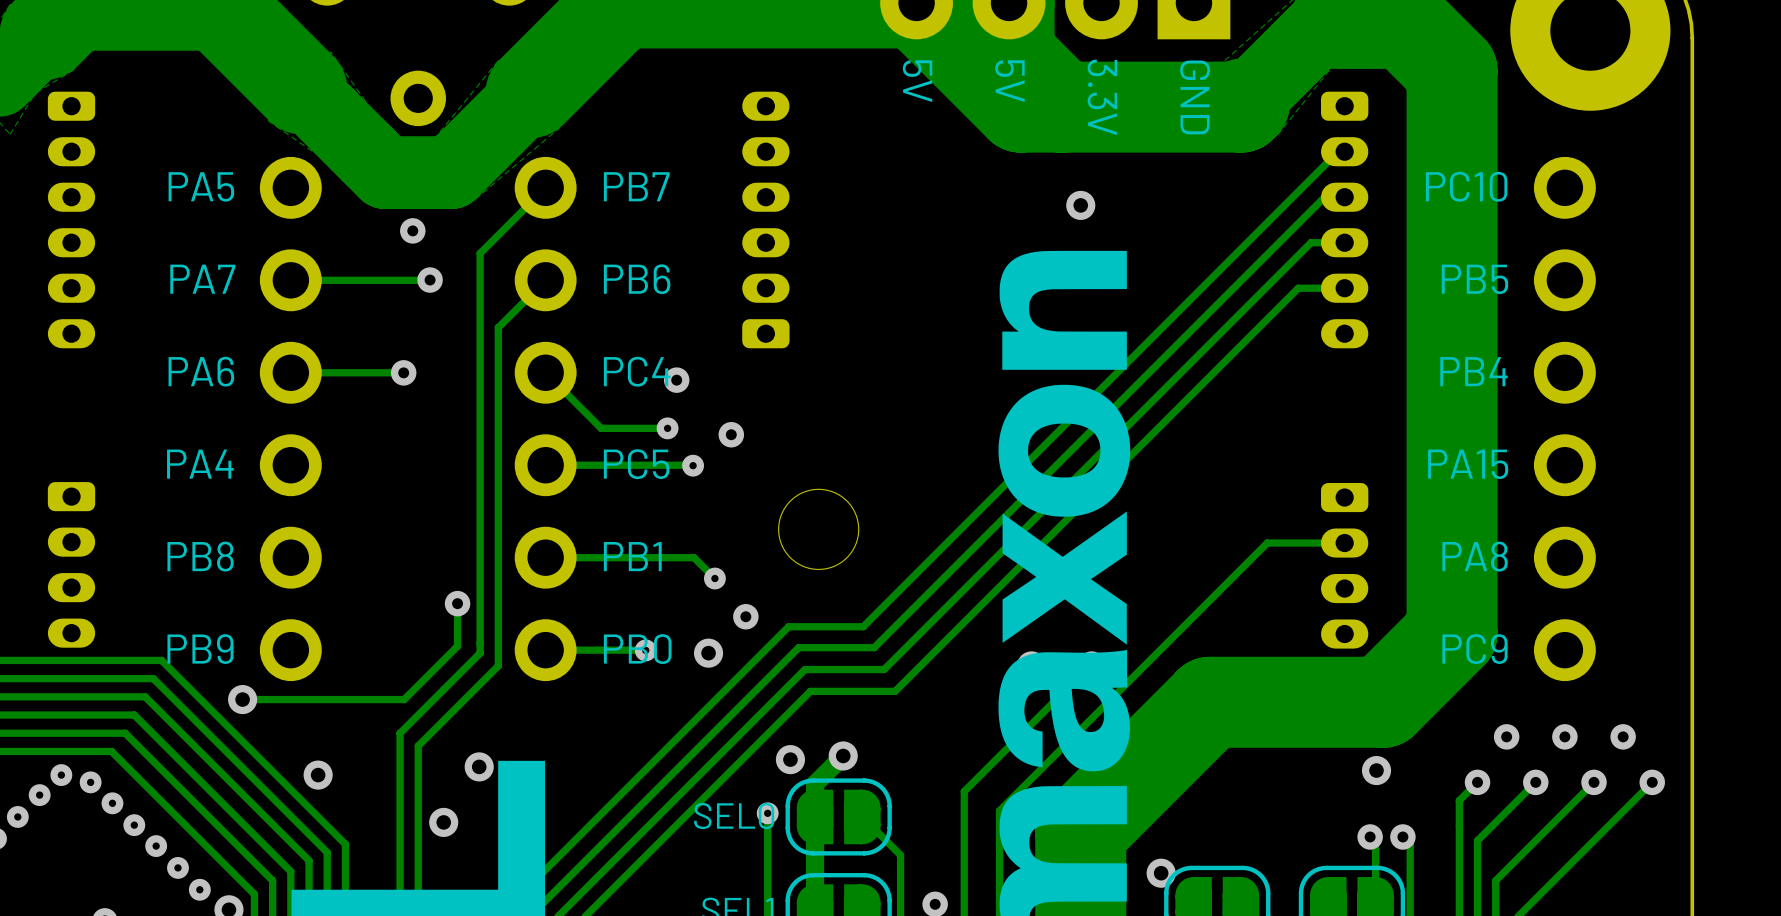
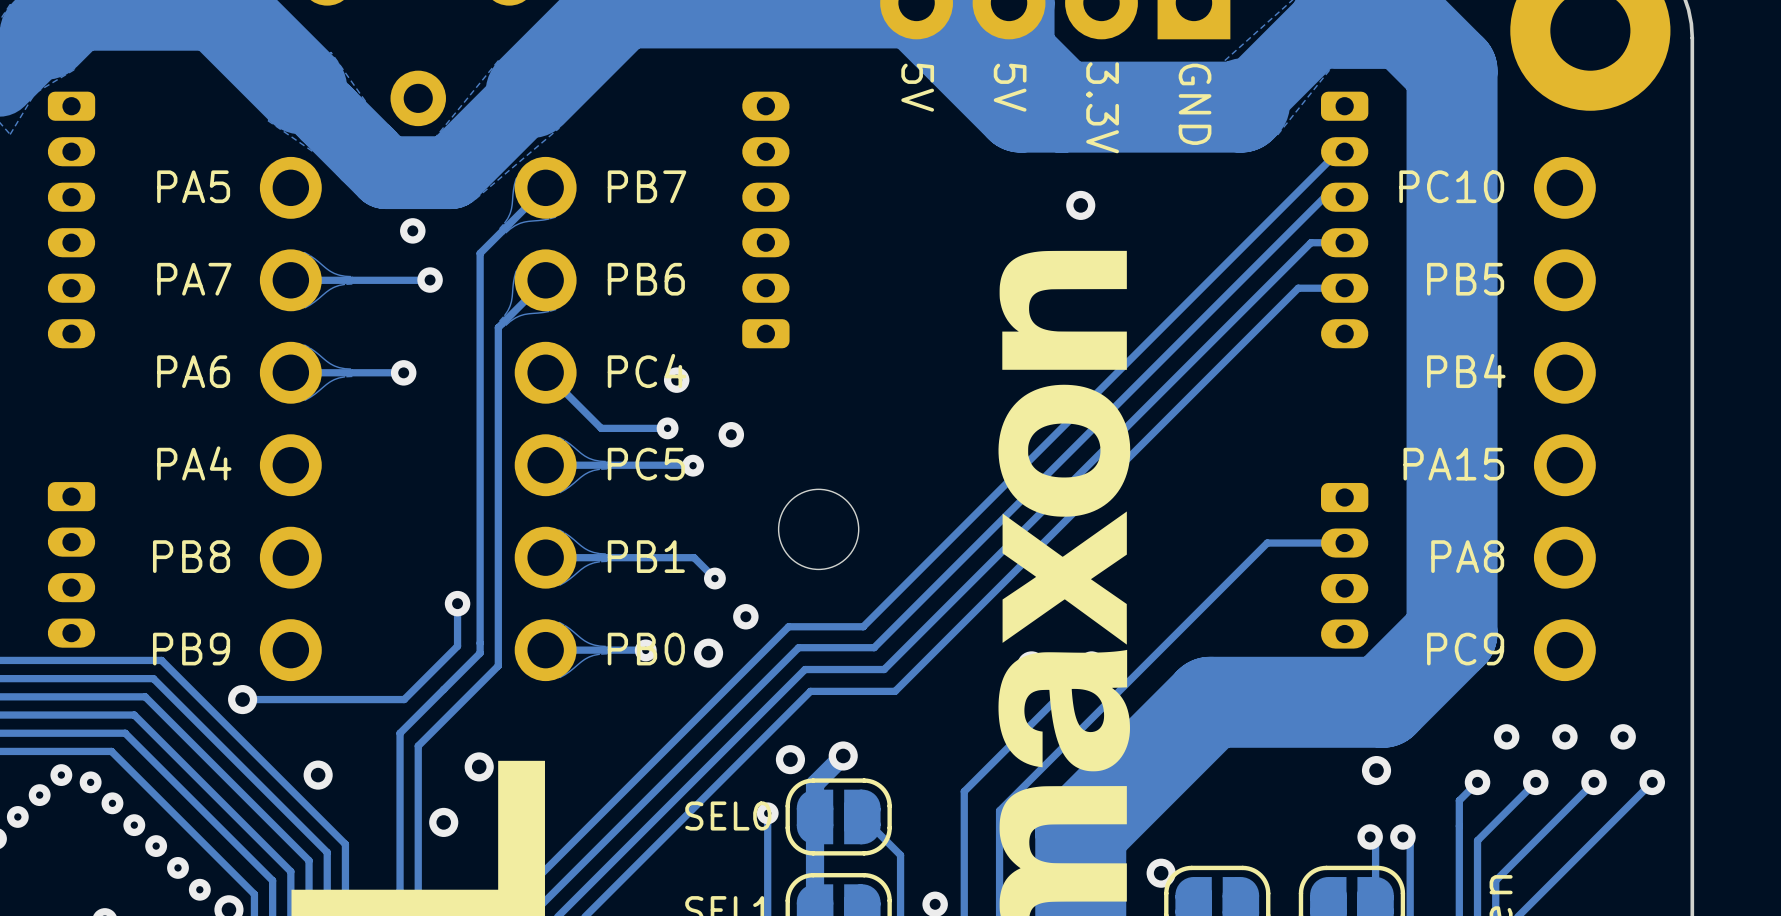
zone outline: none -> (556, 176) (516, 177) (510, 213) (499, 228) (504, 233) (519, 223) (555, 217) (556, 176)
zone outline: none -> (304, 252) (275, 280) (304, 308) (334, 287) (352, 283) (352, 276) (334, 273) (304, 252)
zone outline: none -> (556, 269) (516, 270) (510, 306) (499, 321) (504, 326) (519, 315) (555, 309) (556, 269)
zone outline: none -> (304, 344) (275, 372) (304, 400) (334, 379) (352, 376) (352, 369) (334, 365) (304, 344)
zone outline: none -> (559, 437) (530, 465) (559, 493) (588, 472) (607, 468) (607, 461) (588, 458) (559, 437)
zone outline: none -> (559, 529) (530, 557) (559, 585) (588, 564) (607, 561) (607, 554) (588, 550) (559, 529)
zone outline: none -> (559, 622) (530, 650) (559, 677) (588, 657) (607, 653) (607, 646) (588, 643) (559, 622)

